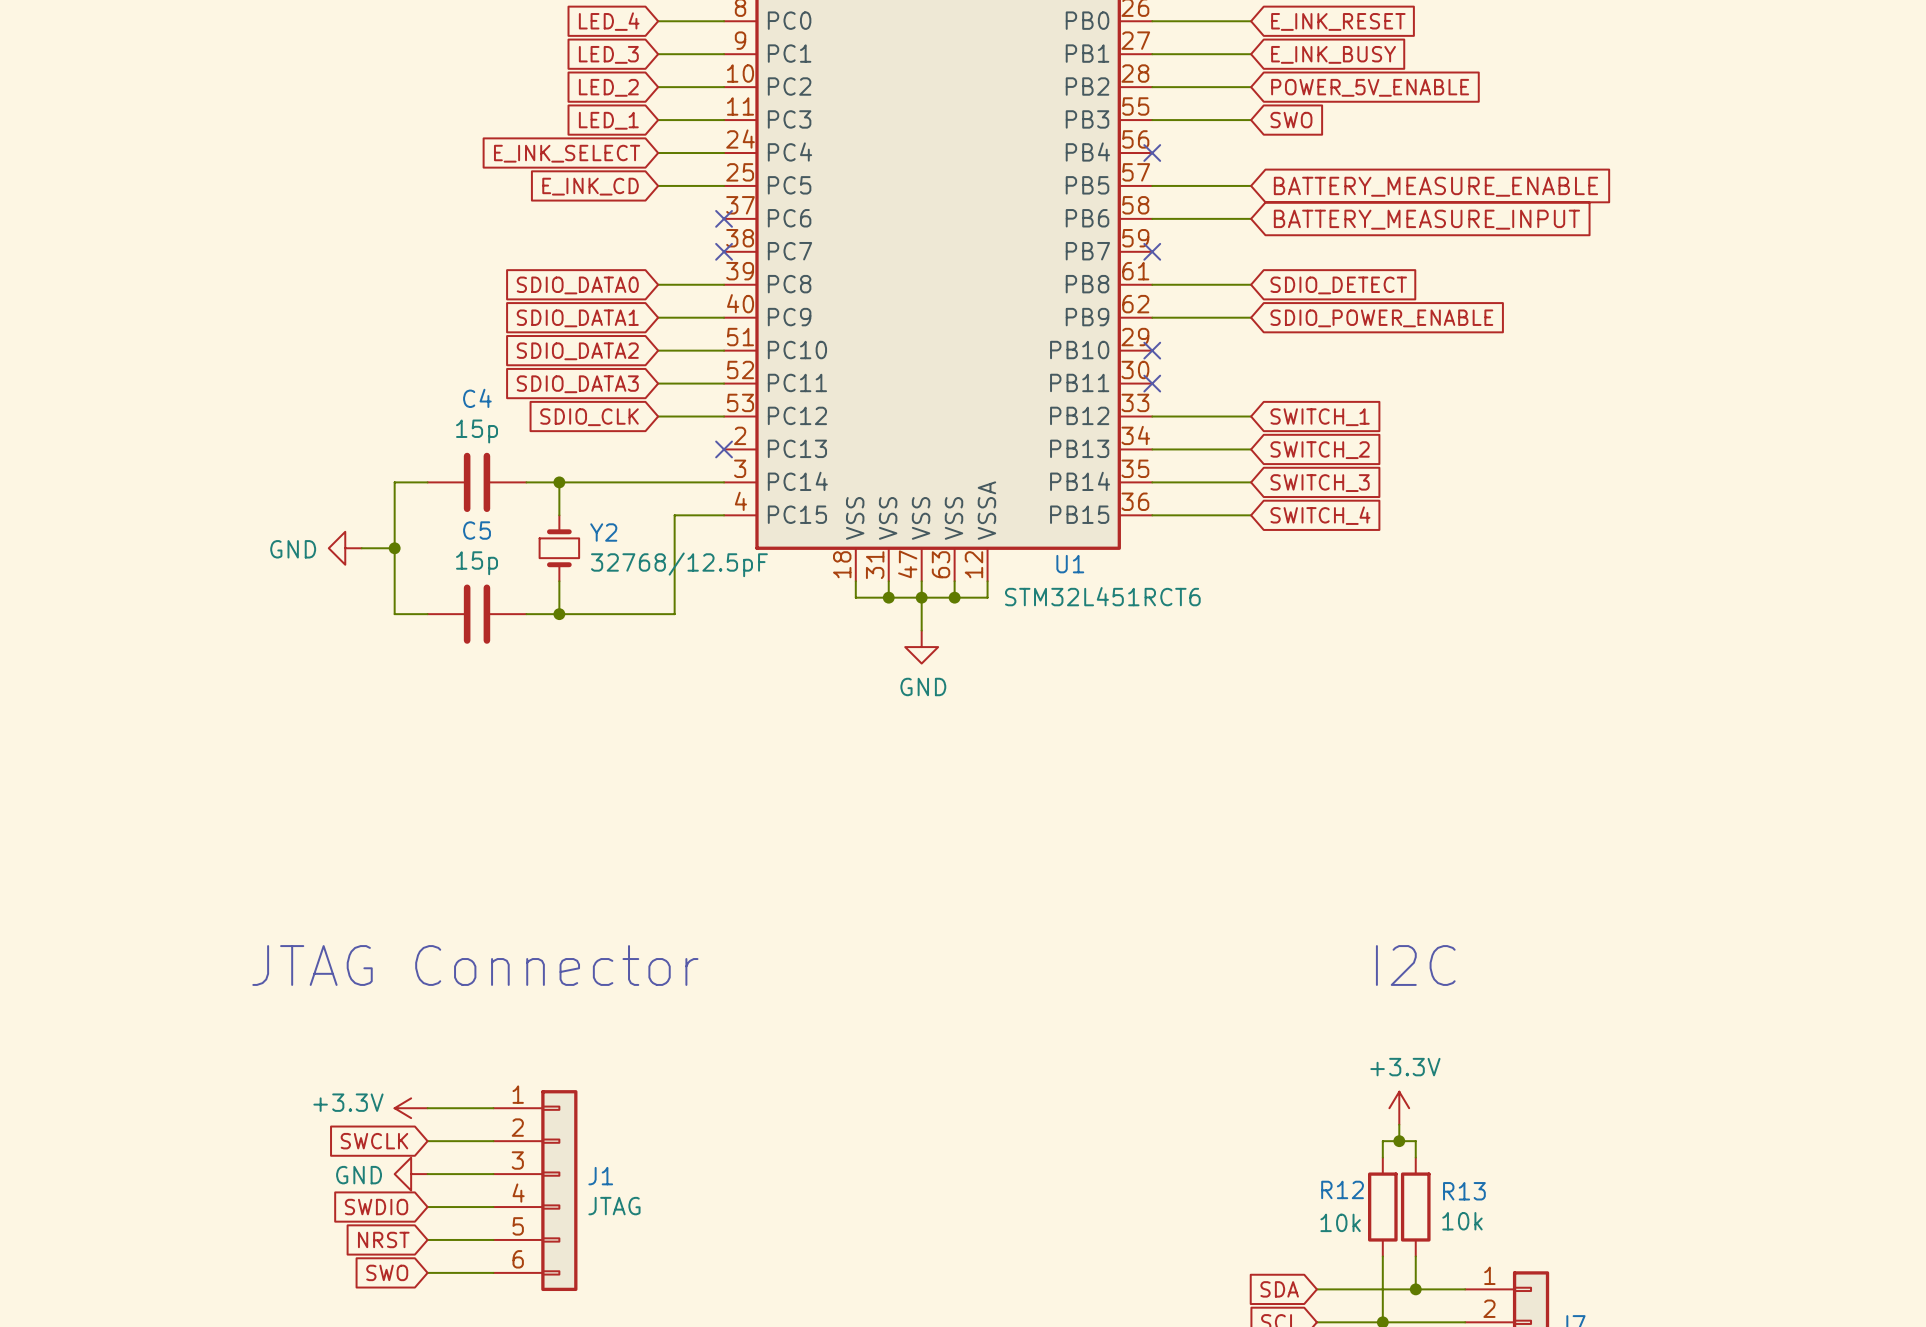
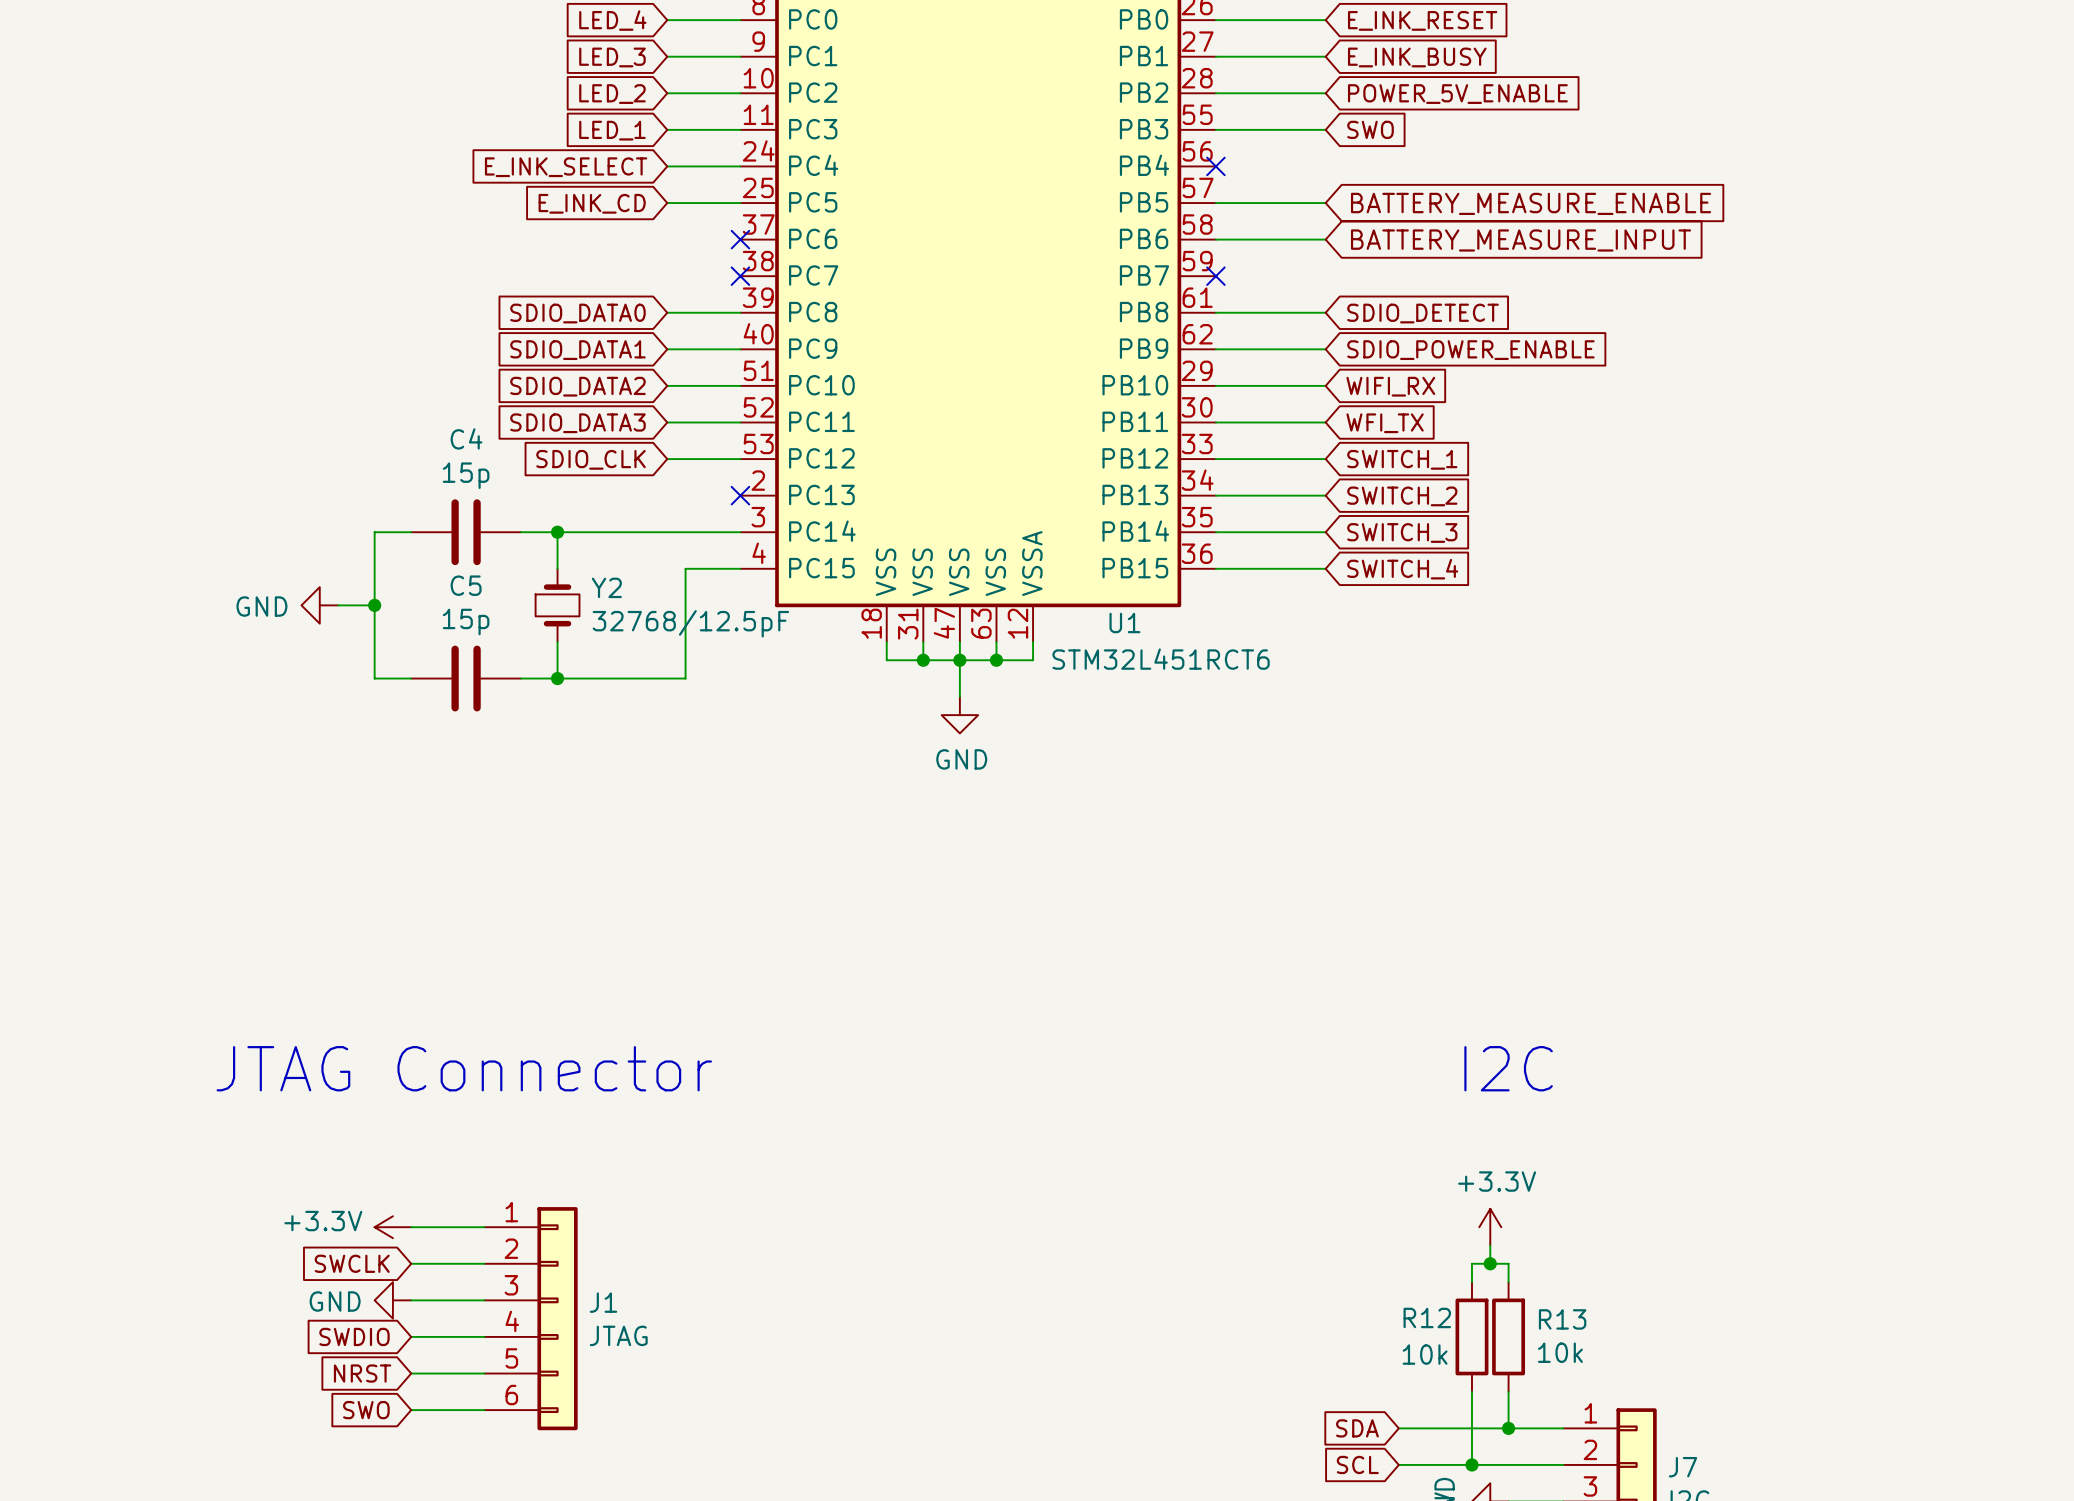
wire: none -> (1215, 385) (1325, 385)
no-connect mark: (1152, 350) -> none
global label: none -> WIFI_RX (1390, 386)
wire: none -> (1215, 422) (1325, 422)
no-connect mark: (1152, 383) -> none
global label: none -> WFI_TX (1385, 423)

